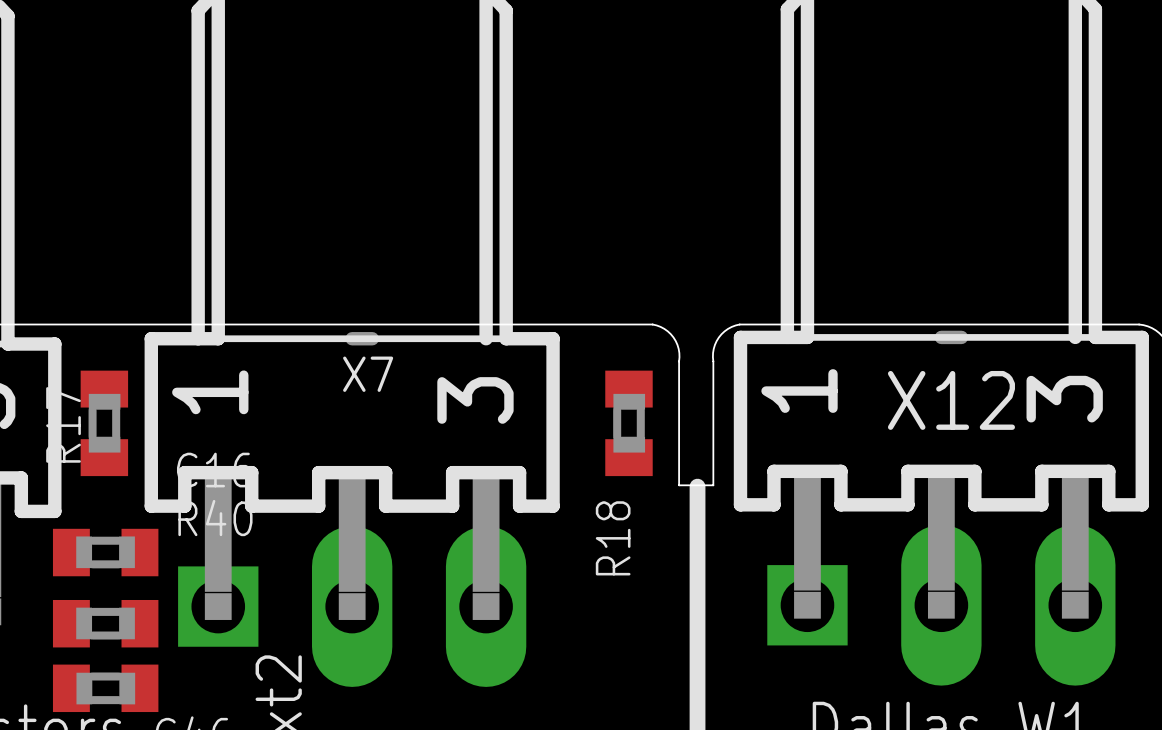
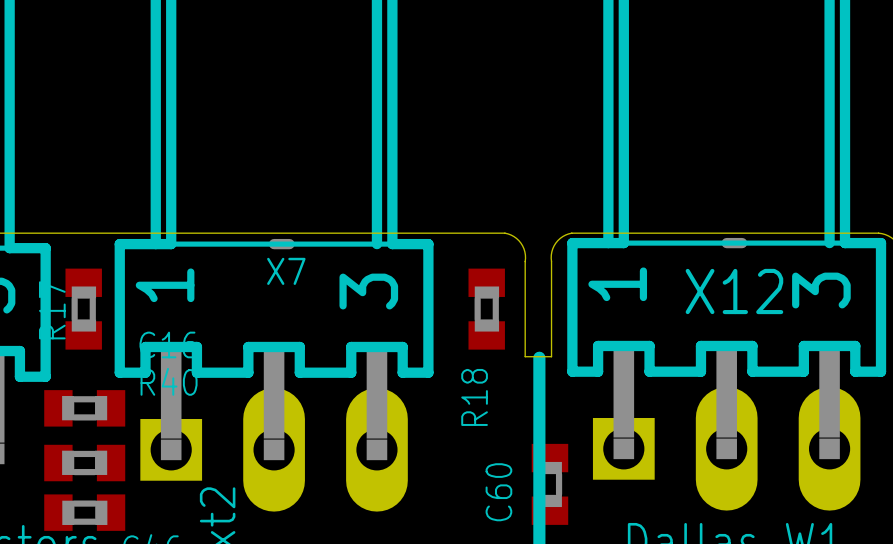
C60: none -> (549, 484)

